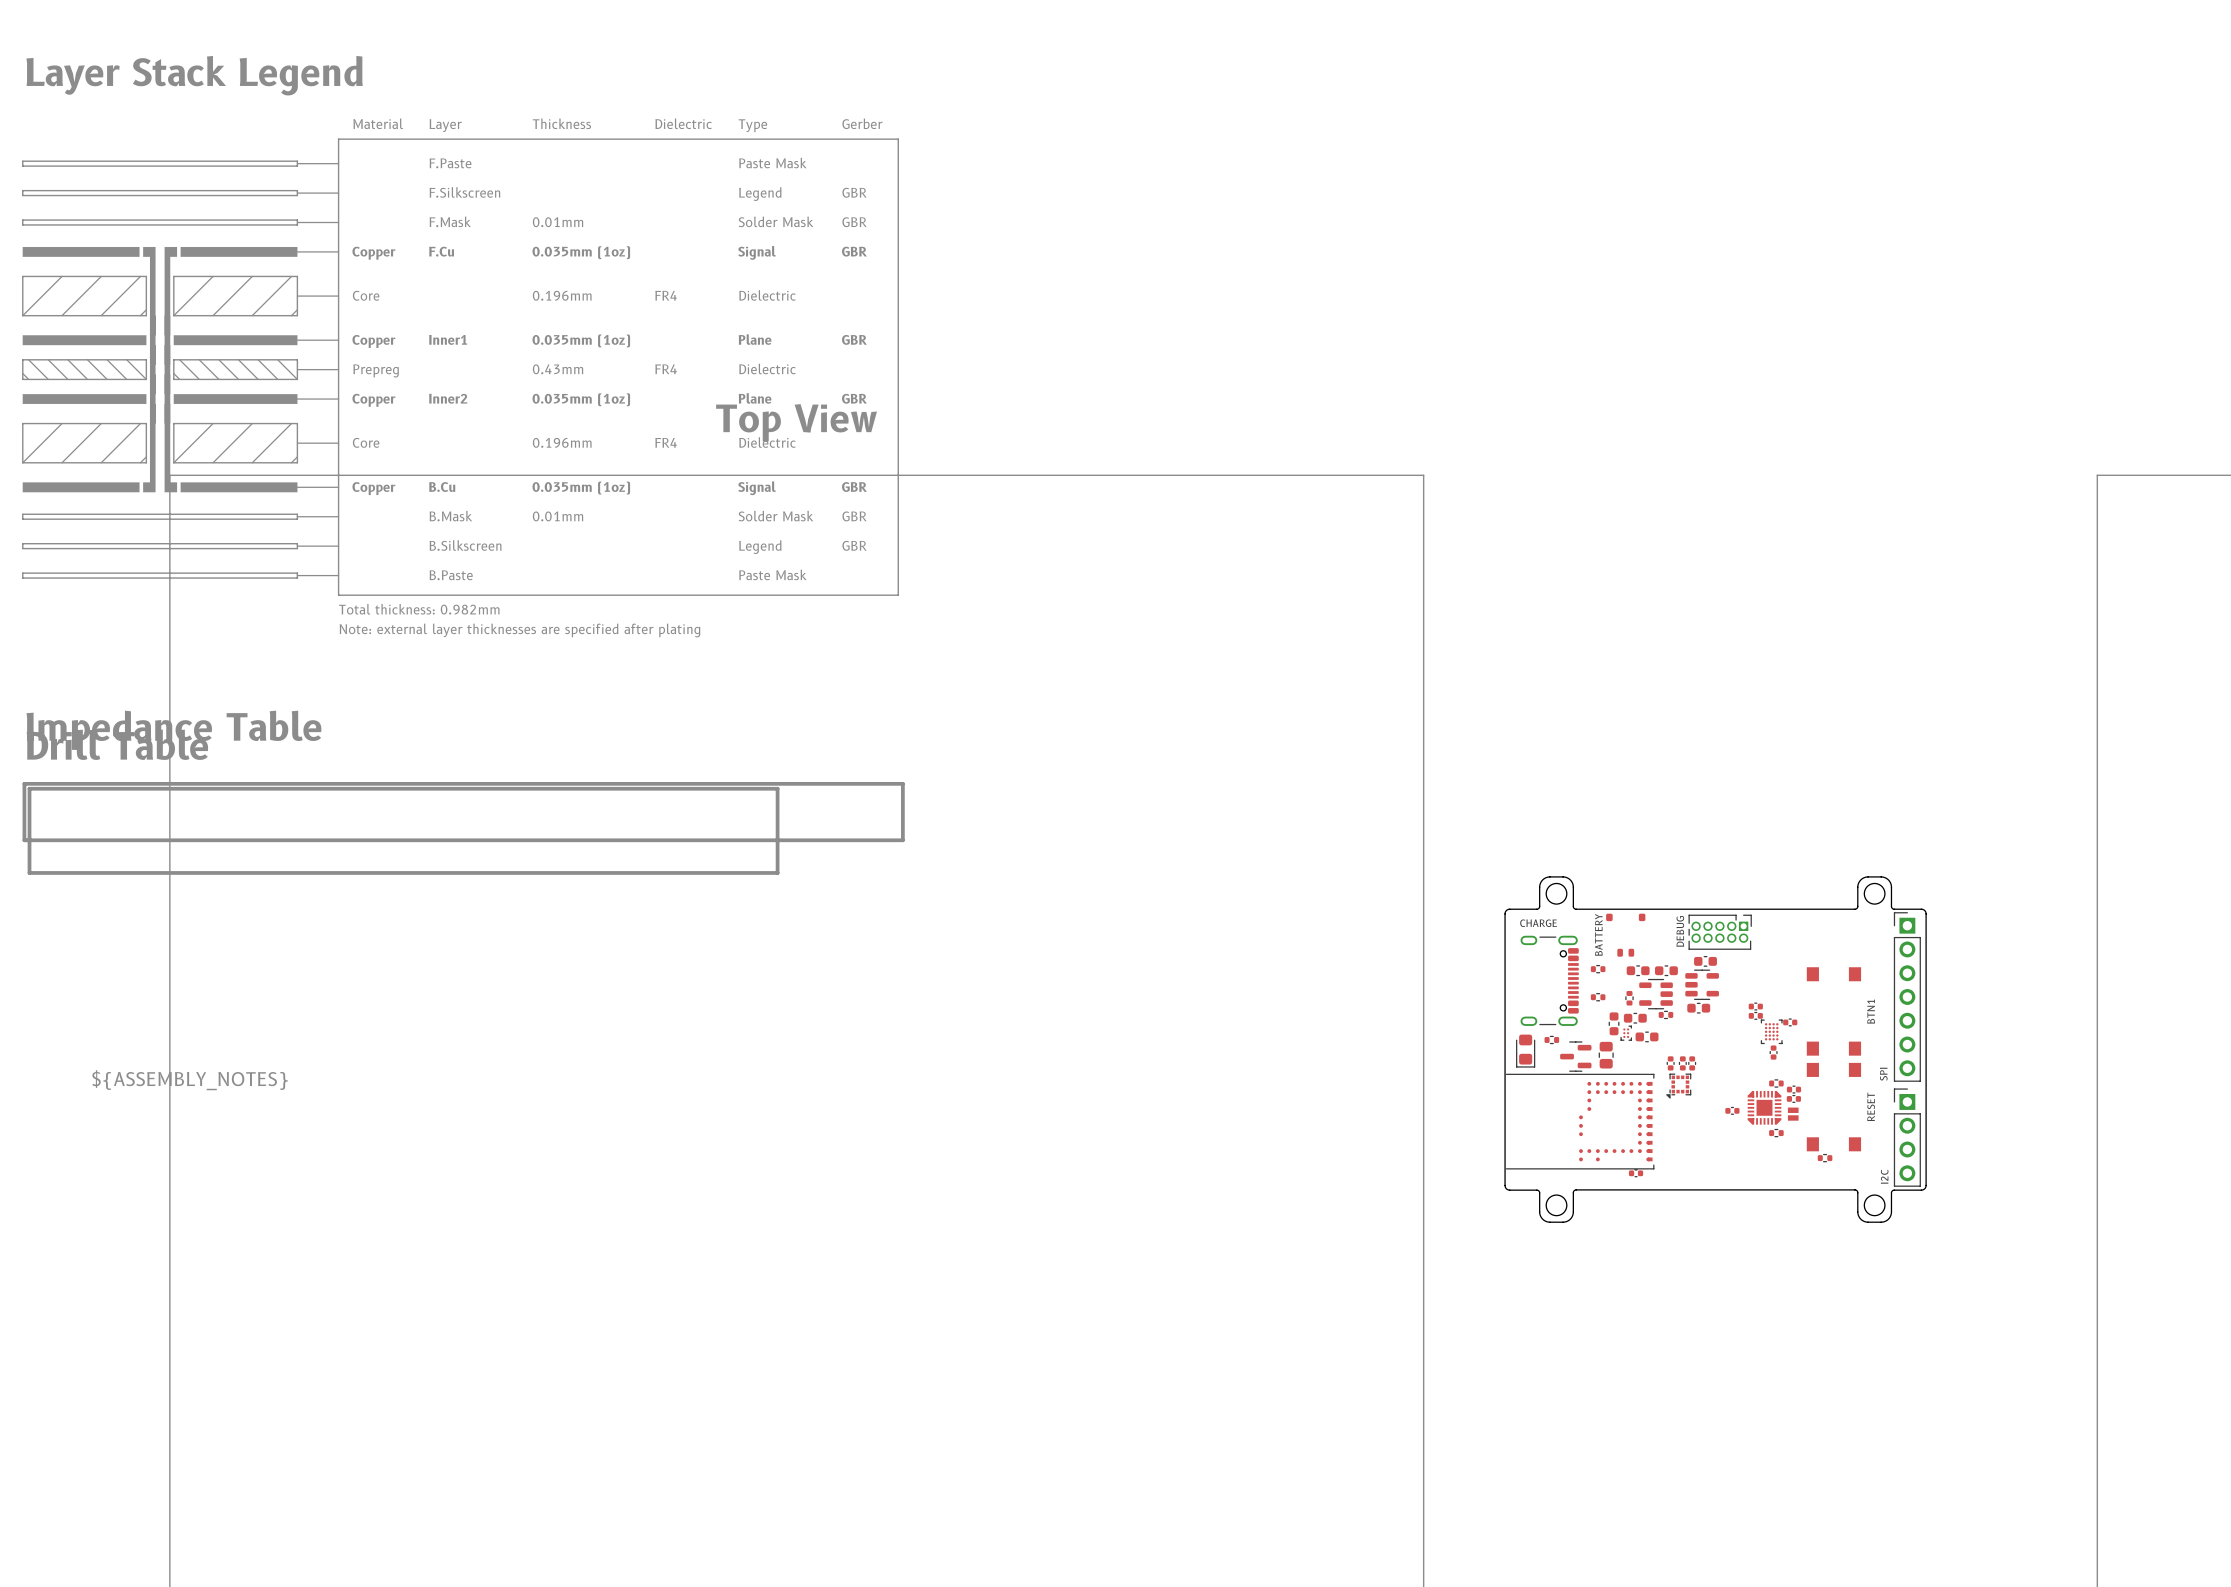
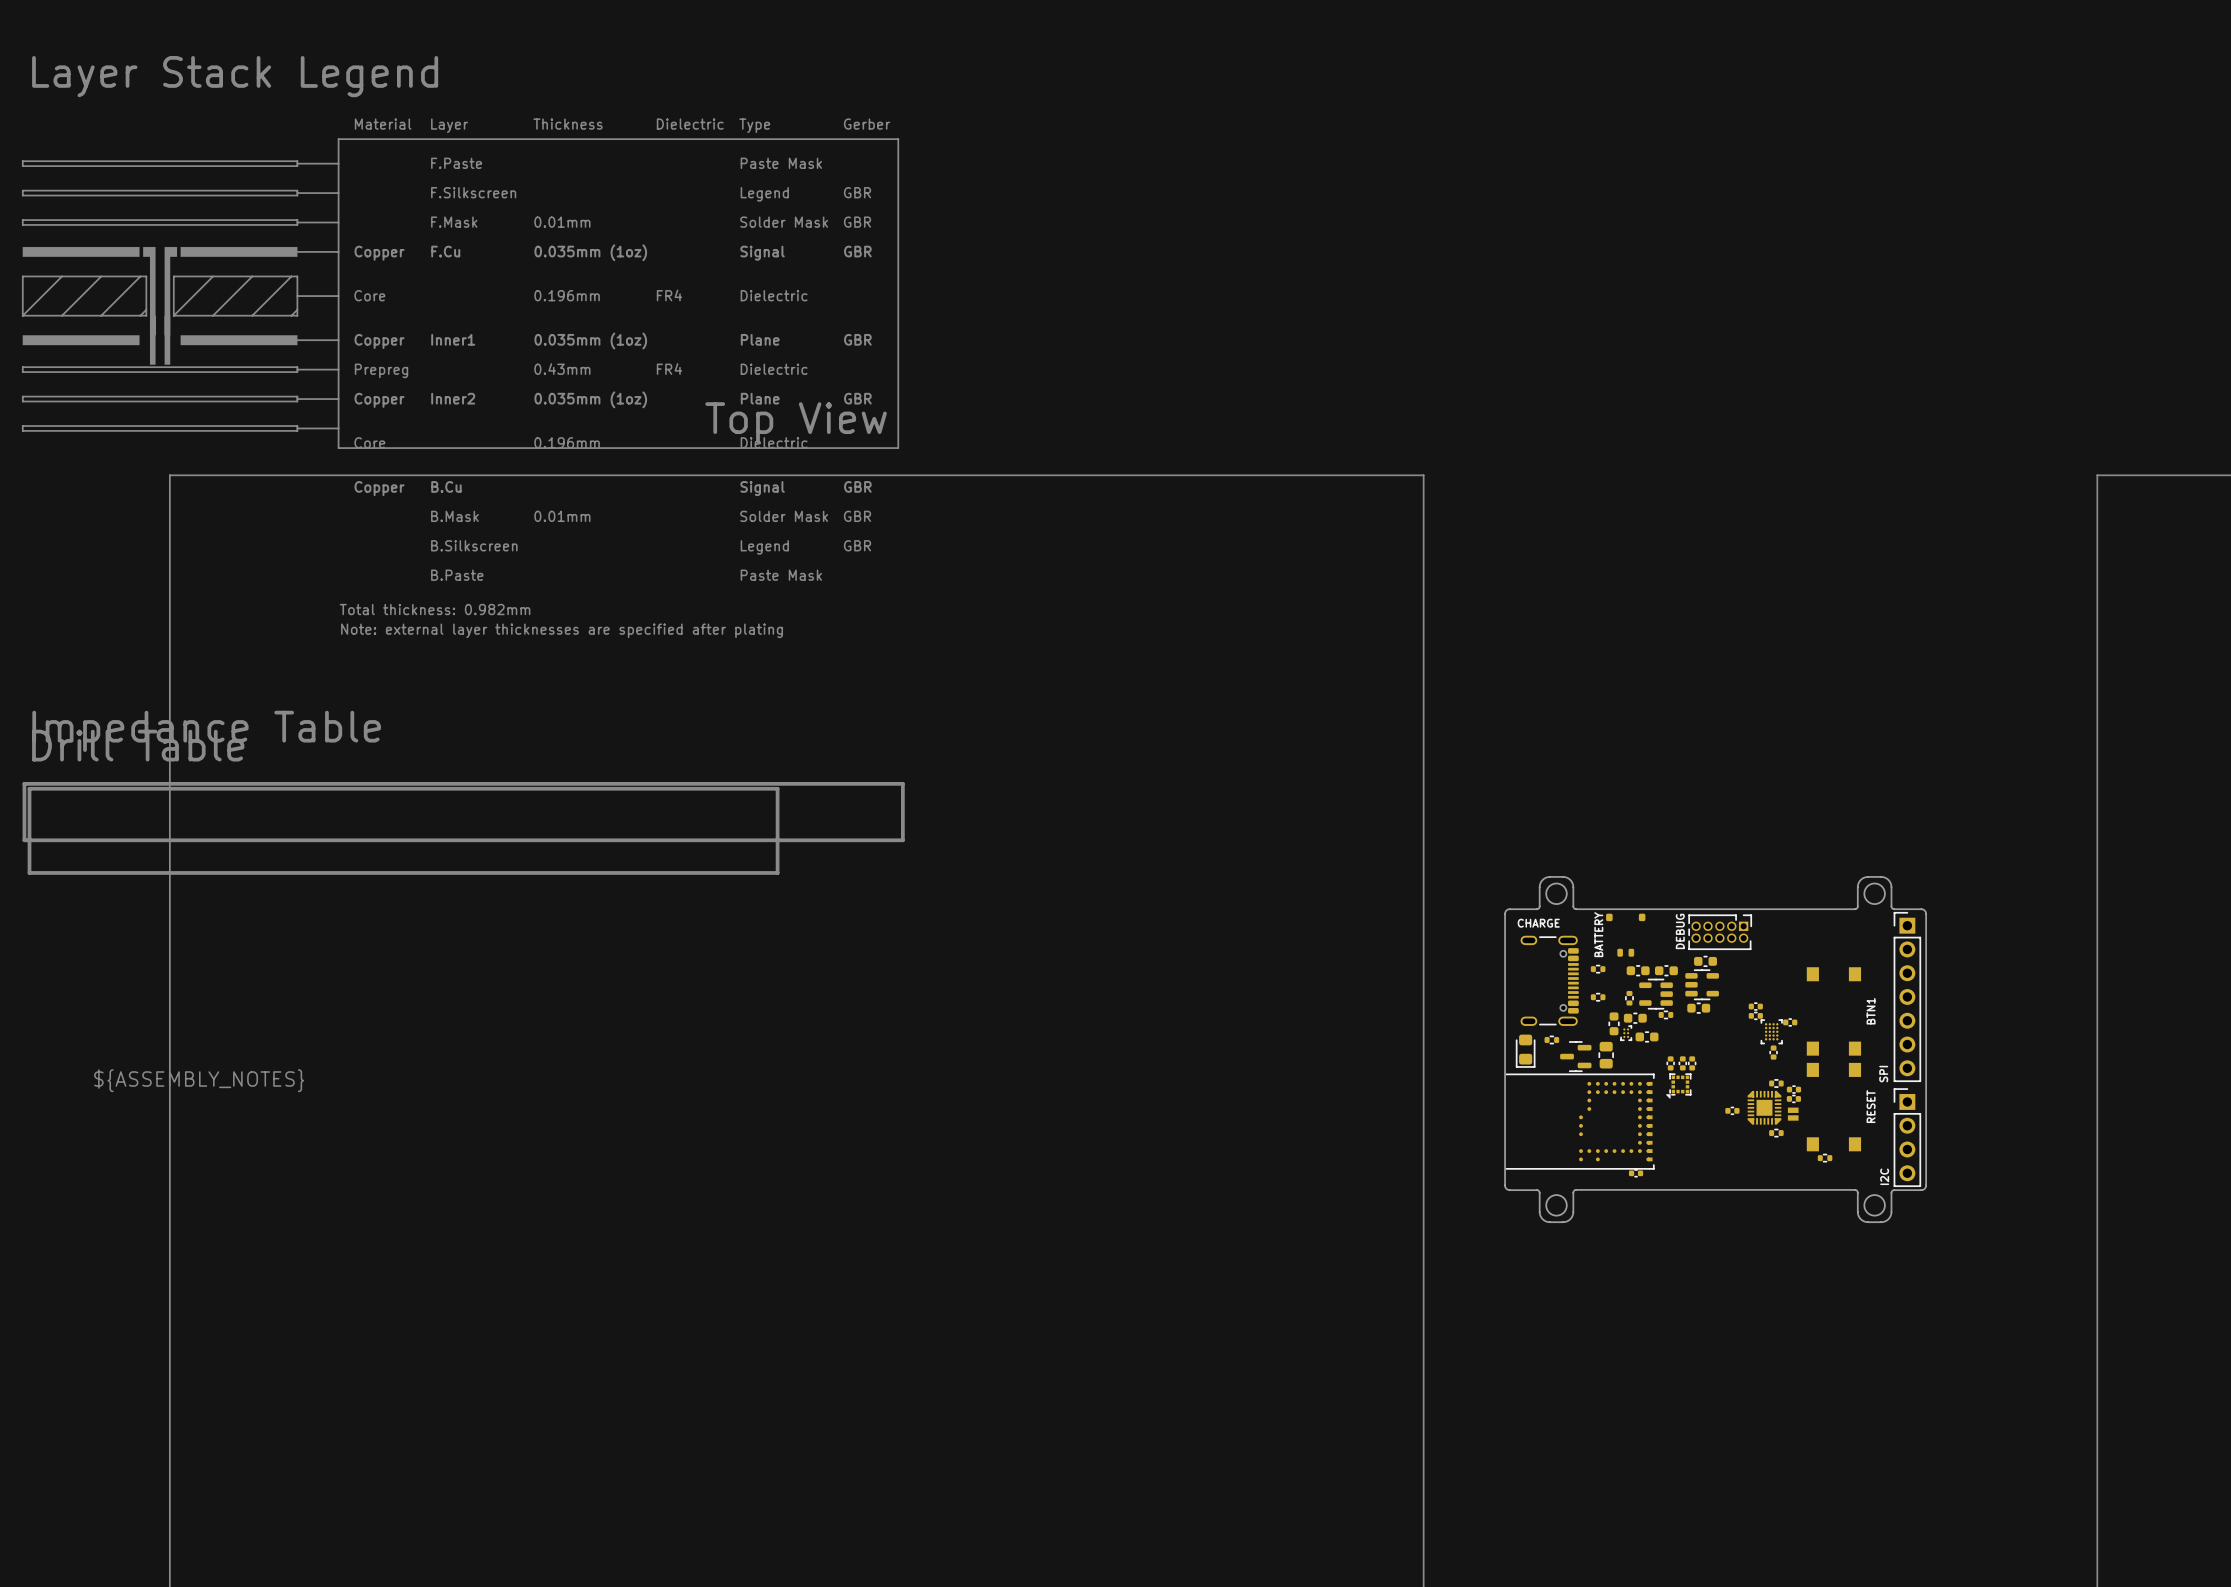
drawing shape: [22, 335, 147, 346] -> [22, 335, 140, 346]
drawing shape: [173, 335, 298, 346] -> [180, 335, 298, 346]
drawing: [22, 345, 298, 493] -> none
line: (28, 359) (48, 379) -> none
line: (48, 359) (67, 379) -> none
line: (67, 359) (87, 379) -> none
line: (87, 359) (107, 379) -> none
line: (107, 359) (126, 379) -> none
line: (126, 359) (146, 379) -> none
line: (179, 359) (199, 379) -> none
line: (199, 359) (218, 379) -> none
line: (218, 359) (238, 379) -> none
line: (238, 359) (258, 379) -> none
line: (258, 359) (277, 379) -> none
line: (277, 359) (297, 379) -> none
line: (22, 367) (22, 359) (146, 359) (146, 379) -> (22, 367) (297, 367)
line: (297, 367) (297, 359) (173, 359) (173, 379) (297, 379) -> none
line: (22, 372) (22, 379) (146, 379) -> (22, 372) (297, 372)
line: (22, 373) (28, 379) -> none
line: (173, 373) (179, 379) -> none
line: (62, 423) (22, 462) -> none
line: (101, 423) (62, 462) -> none
line: (140, 423) (101, 462) -> none
line: (213, 423) (173, 462) -> none
line: (252, 423) (213, 462) -> none
line: (291, 423) (252, 462) -> none
line: (22, 426) (22, 423) (146, 423) (146, 462) (22, 462) -> none
line: (297, 426) (297, 423) (173, 423) (173, 462) -> (297, 426) (22, 426)
line: (22, 430) (22, 462) -> none
line: (297, 430) (297, 462) (173, 462) -> (297, 430) (22, 430)
text: FR4 (666, 442) -> none
line: (297, 443) (338, 443) -> none
line: (338, 448) (338, 595) (898, 595) (898, 448) -> (338, 448) (898, 448)
line: (146, 456) (140, 462) -> none
line: (297, 456) (291, 462) -> none
line: (297, 487) (338, 487) -> none
text: 0.035mm (1oz) (581, 488) -> none
line: (22, 514) (297, 514) (297, 519) (22, 519) (22, 514) -> (22, 396) (297, 396) (297, 401) (22, 401) (22, 396)
line: (297, 516) (338, 516) -> none
line: (22, 543) (22, 548) (297, 548) (297, 543) (22, 543) -> none
line: (297, 546) (338, 546) -> (297, 428) (338, 428)
line: (22, 573) (22, 578) (297, 578) (297, 573) (22, 573) -> none
line: (297, 575) (338, 575) -> none

